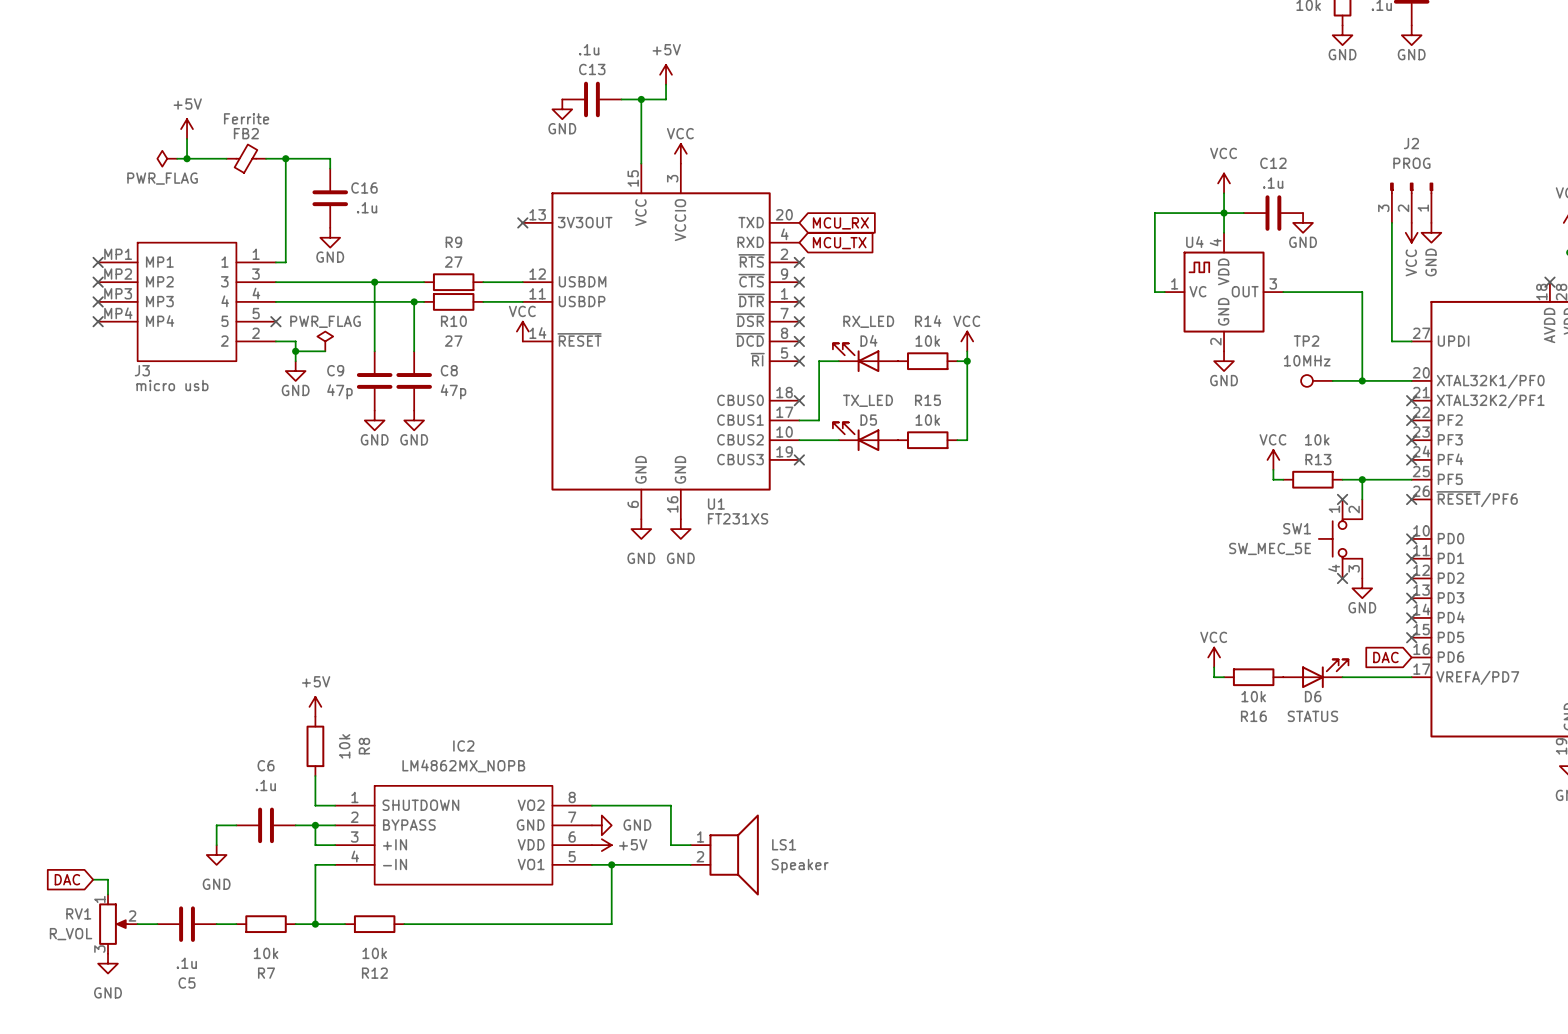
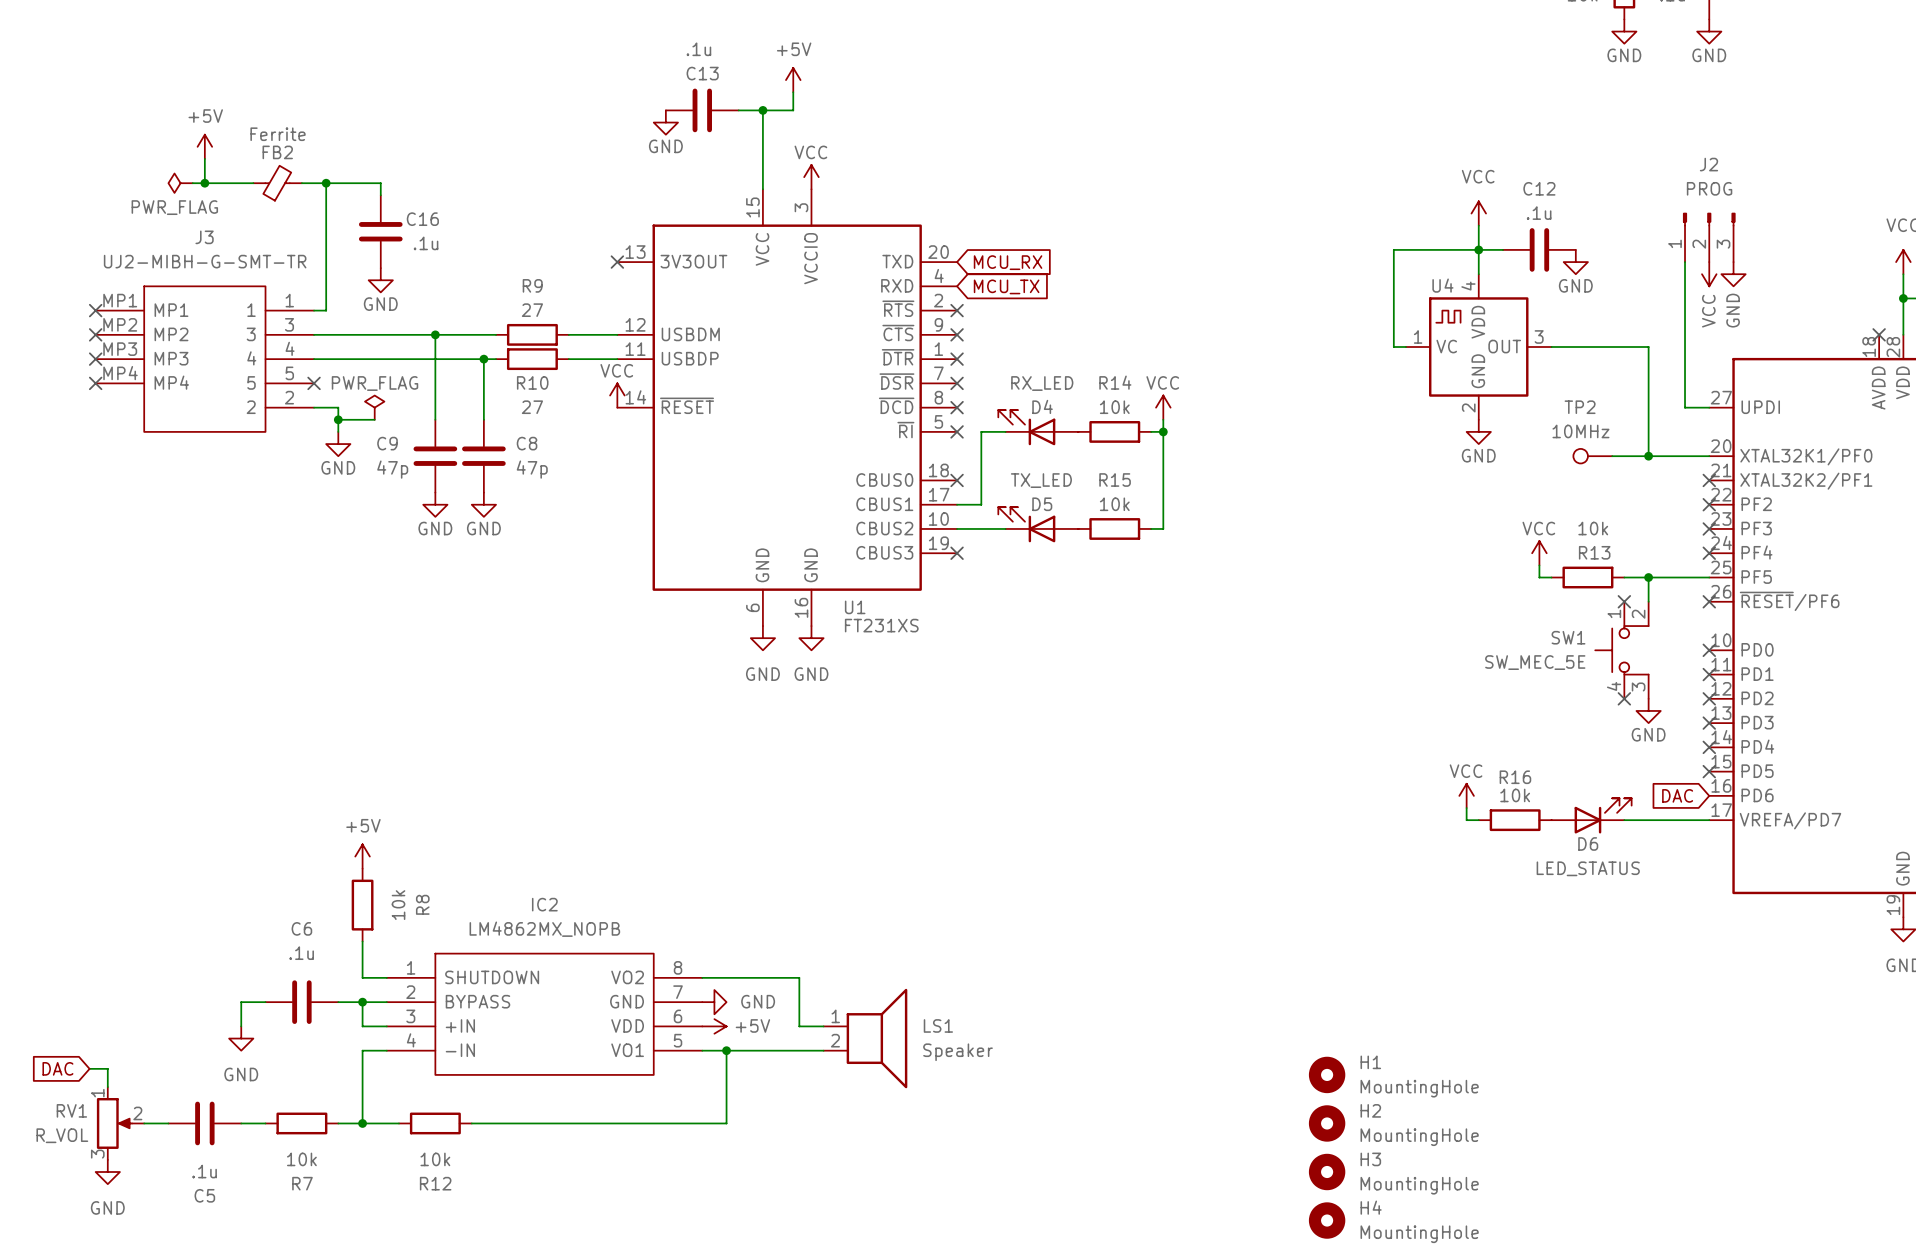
J2 flip: as is (1411, 188) -> left-right (1709, 219)
J3 name position: J3 (142, 370) -> J3 (204, 237)
J3 value: micro usb (172, 385) -> UJ2-MIBH-G-SMT-TR (205, 261)
R16 value position: 10k (1253, 696) -> 10k (1515, 795)
R16 name position: R16 (1253, 716) -> R16 (1515, 777)
D6 value: STATUS (1312, 716) -> LED_STATUS (1588, 868)
H1: none -> MountingHole (1327, 1074)
H2: none -> MountingHole (1327, 1123)
H3: none -> MountingHole (1327, 1172)
H4: none -> MountingHole (1327, 1220)

